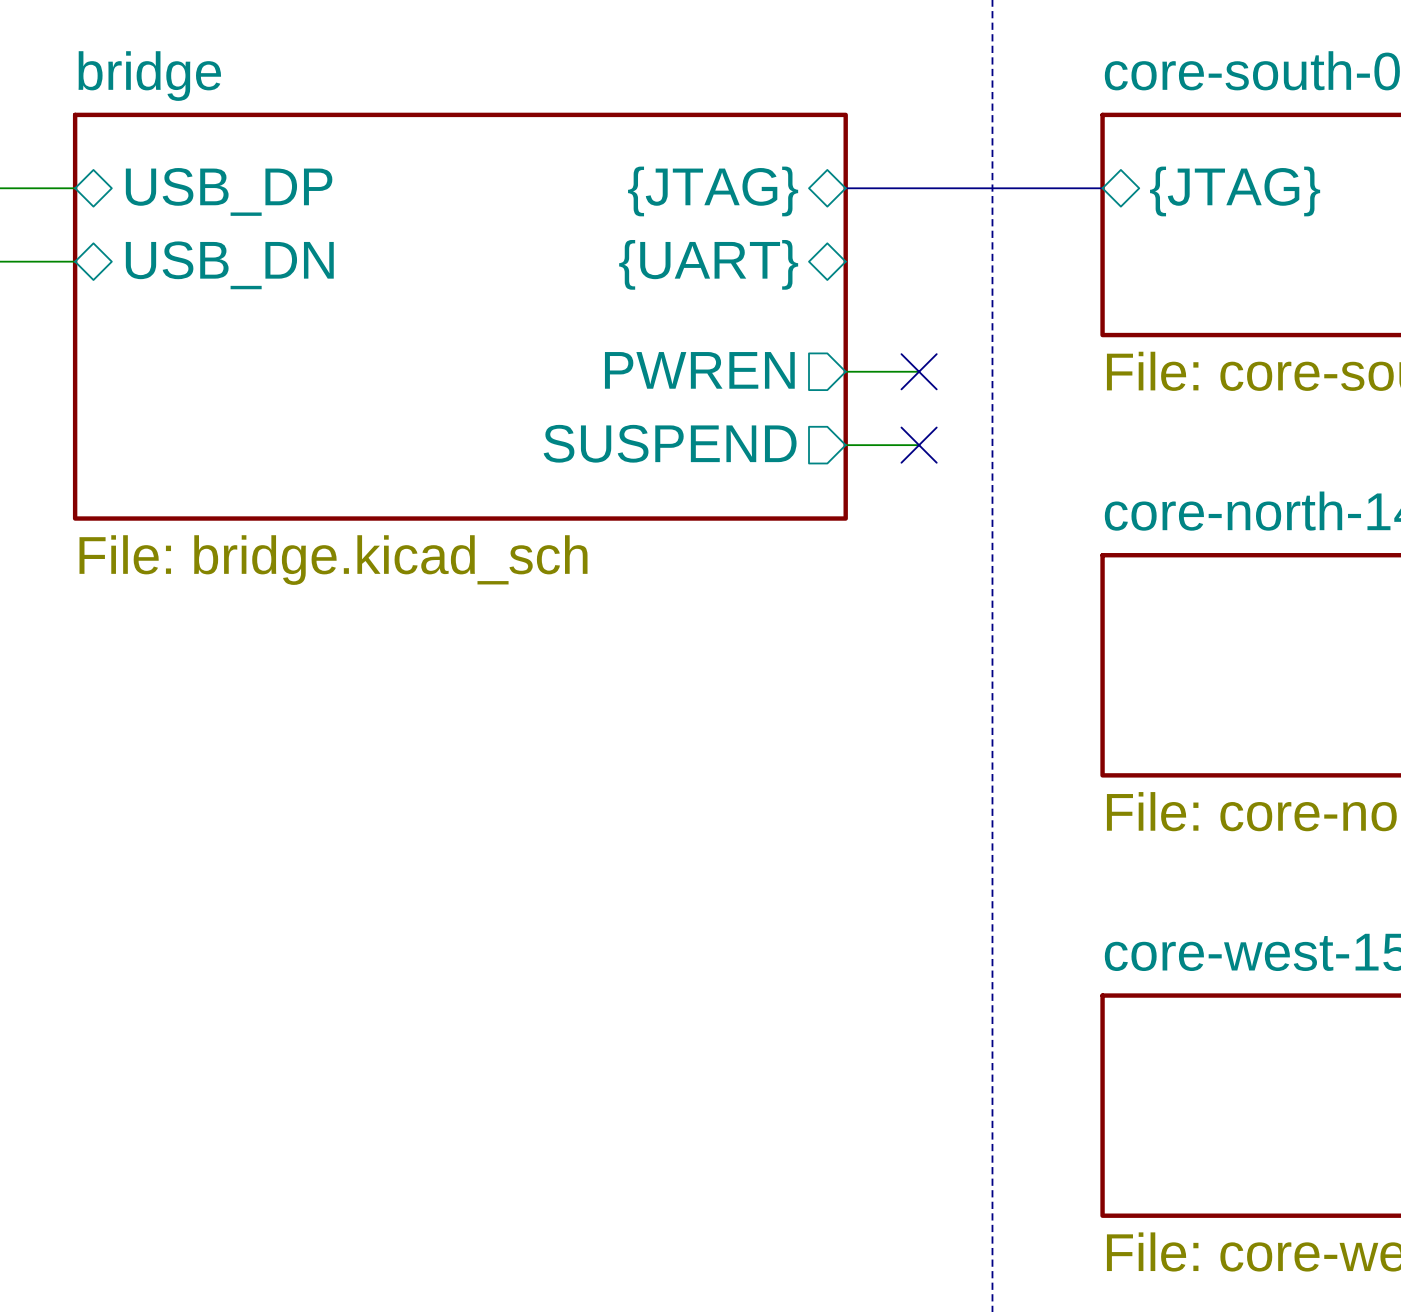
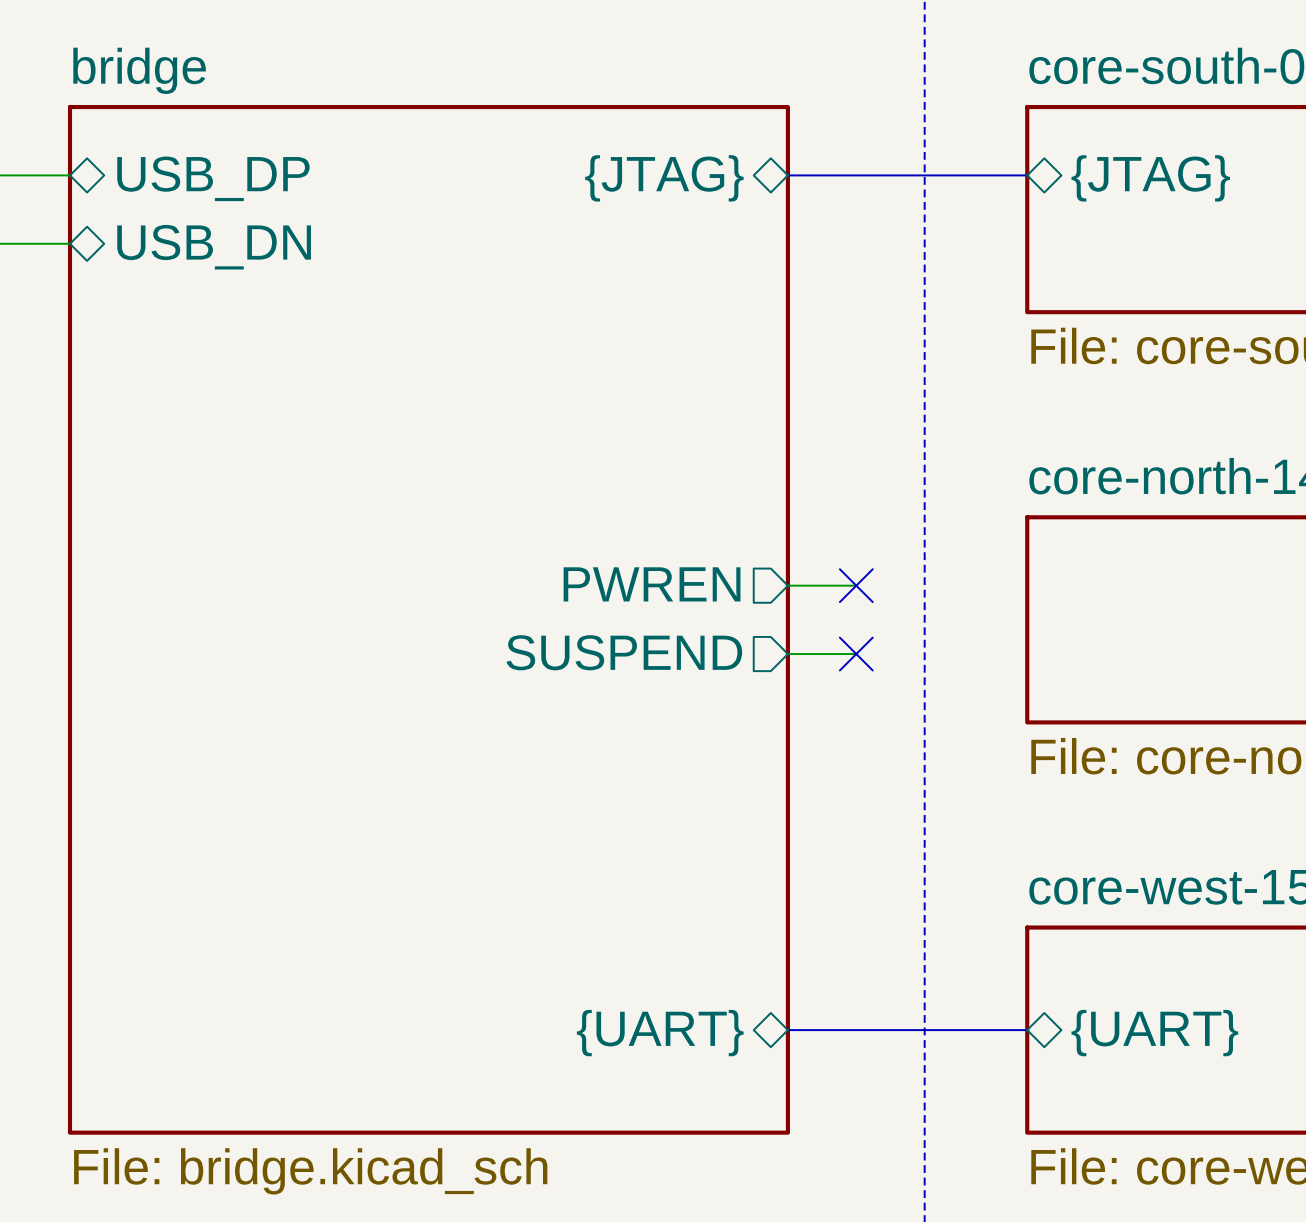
sheet pin: {UART} (708, 264) -> none
sheet bridge: File: bridge.kicad_sch (460, 316) -> none
sheet pin position: PWREN (699, 370) -> PWREN (652, 584)
wire: (845, 371) (919, 371) -> (787, 585) (856, 585)
no-connect mark: (919, 371) -> none
sheet pin position: SUSPEND (670, 443) -> SUSPEND (624, 652)
wire: (845, 445) (919, 445) -> (787, 654) (856, 654)
no-connect mark: (919, 445) -> none
no-connect mark: none -> (856, 585)
sheet bridge: none -> File: bridge.kicad_sch (428, 619)
no-connect mark: none -> (856, 654)
bus: none -> (787, 1030) (1027, 1030)
sheet pin: none -> {UART} (660, 1033)
sheet pin: none -> {UART} (1154, 1033)

